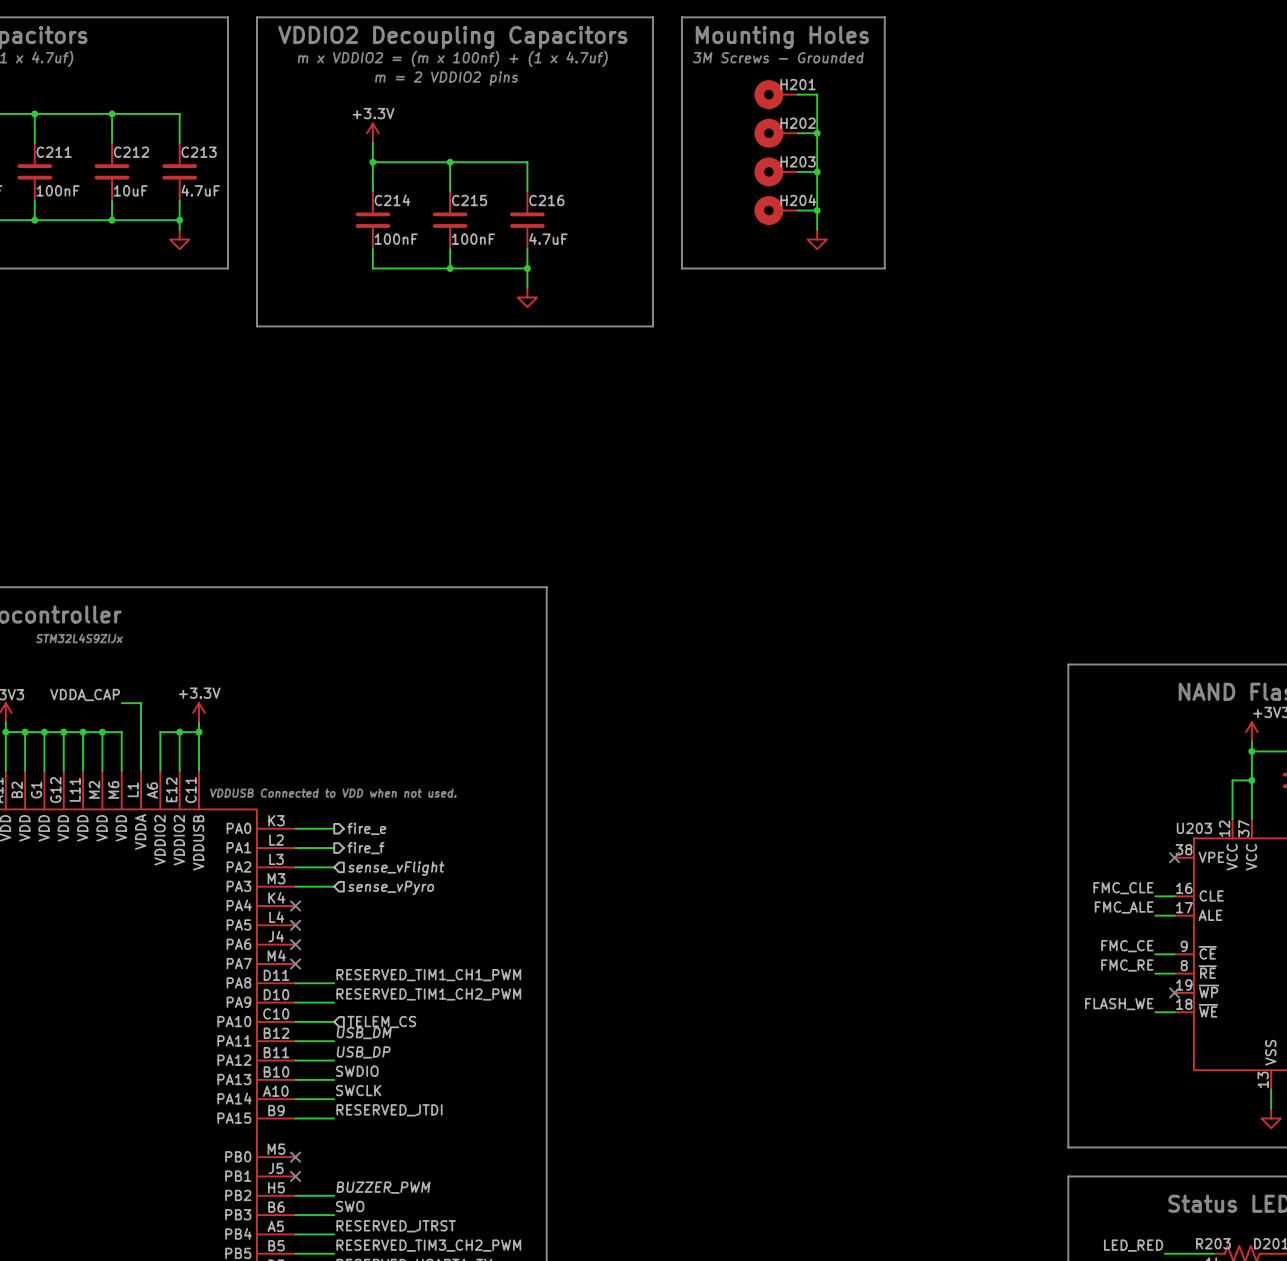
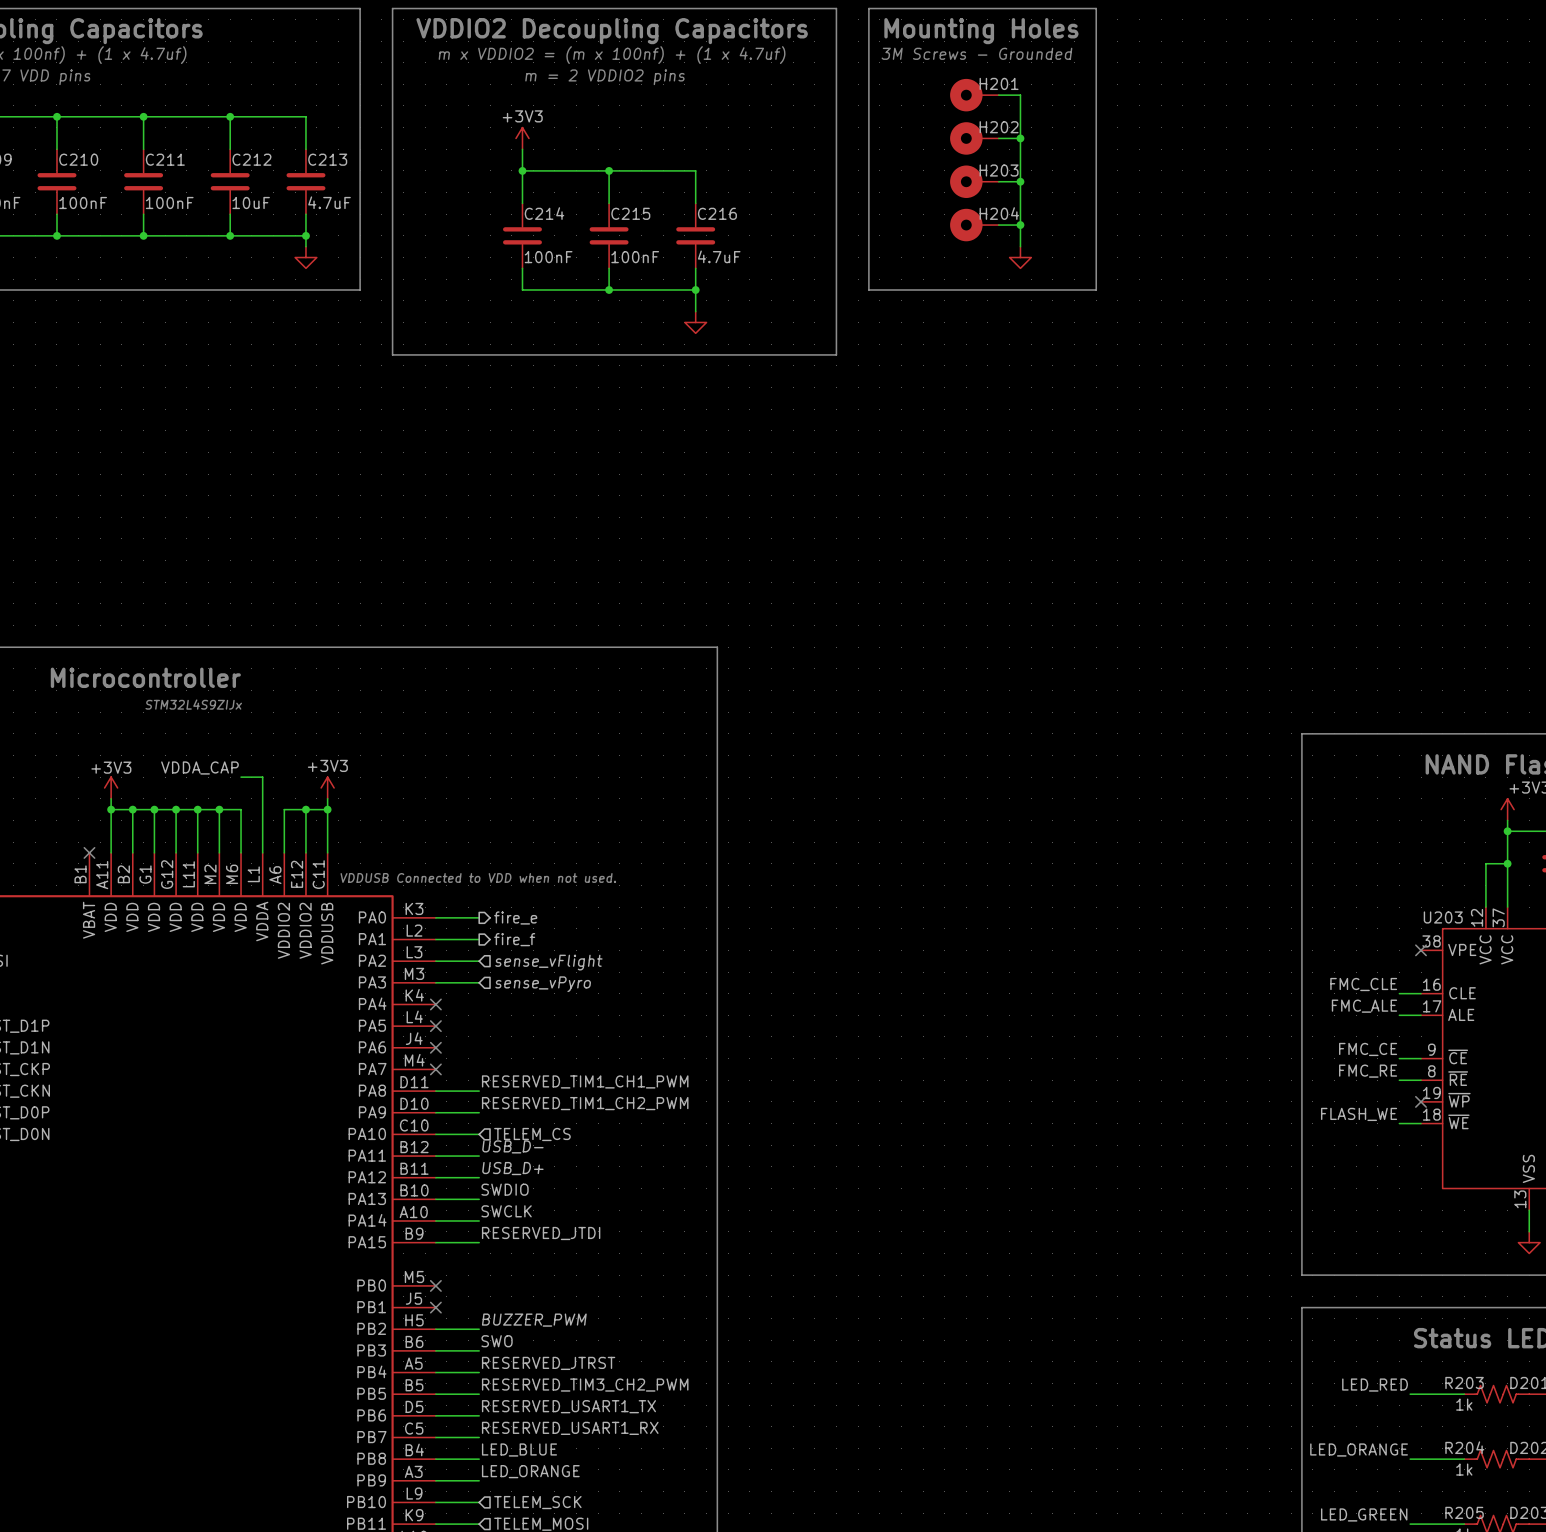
power symbol: +3.3V (372, 133) -> +3V3 (522, 138)
power symbol: +3.3V (198, 712) -> +3V3 (327, 787)
label: USB_DM (364, 1033) -> USB_D- (512, 1146)
label: USB_DP (363, 1052) -> USB_D+ (512, 1168)

